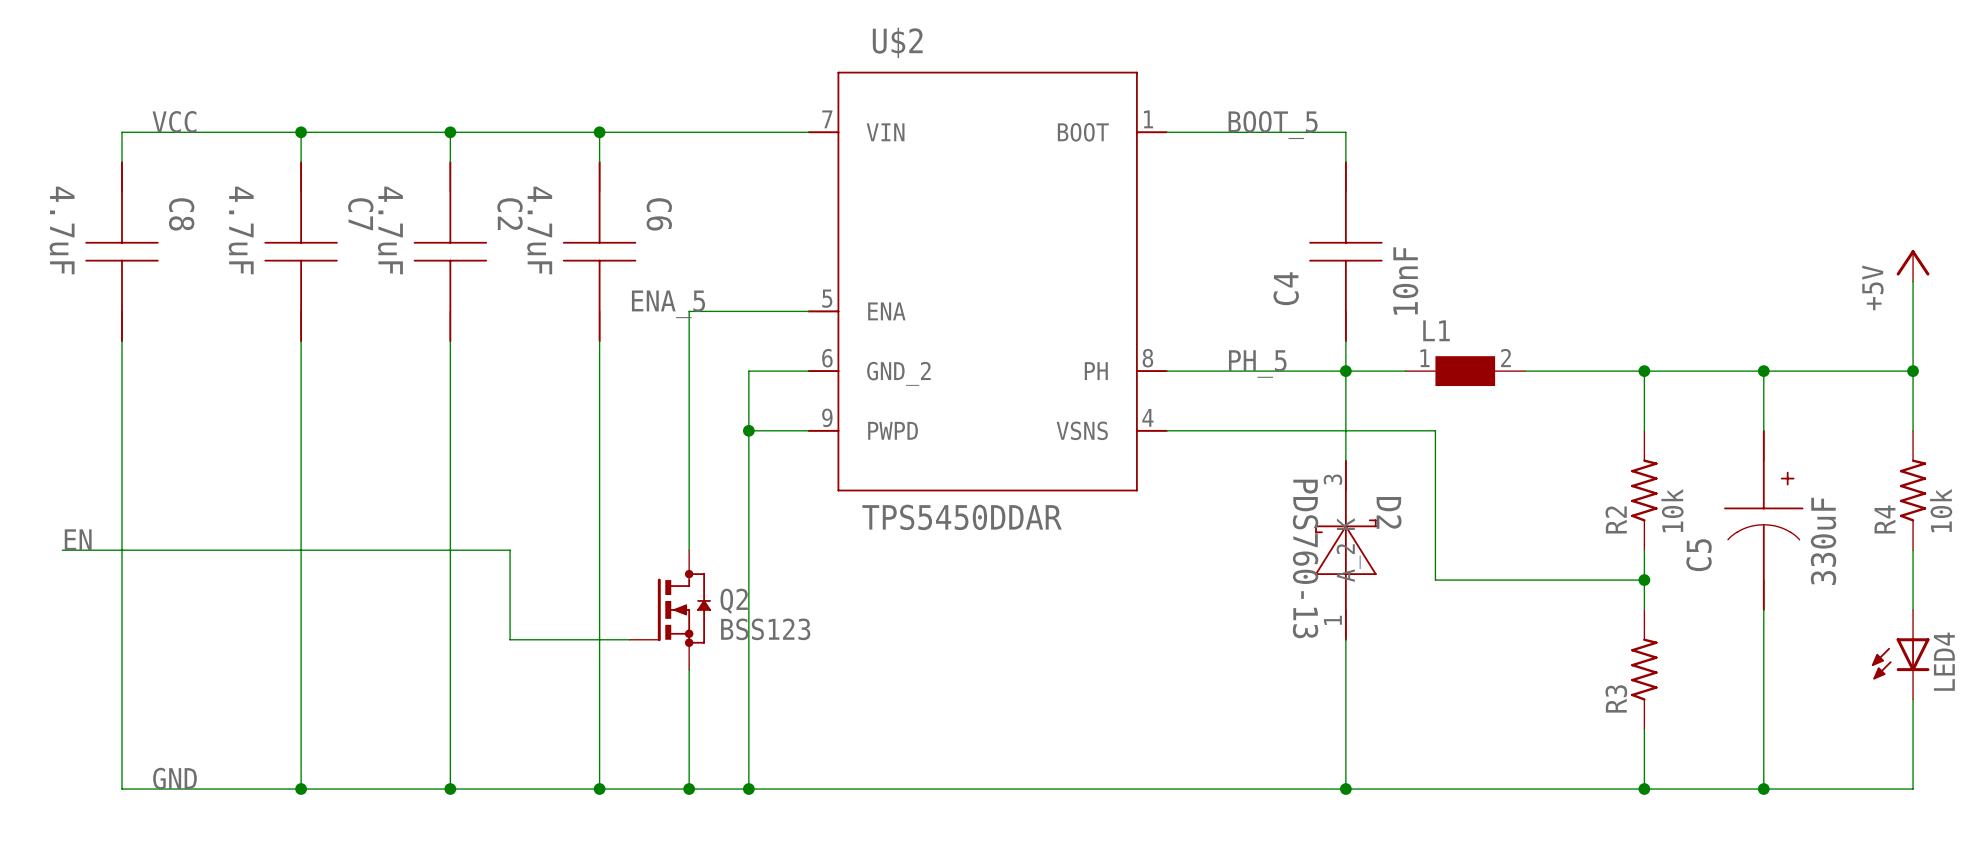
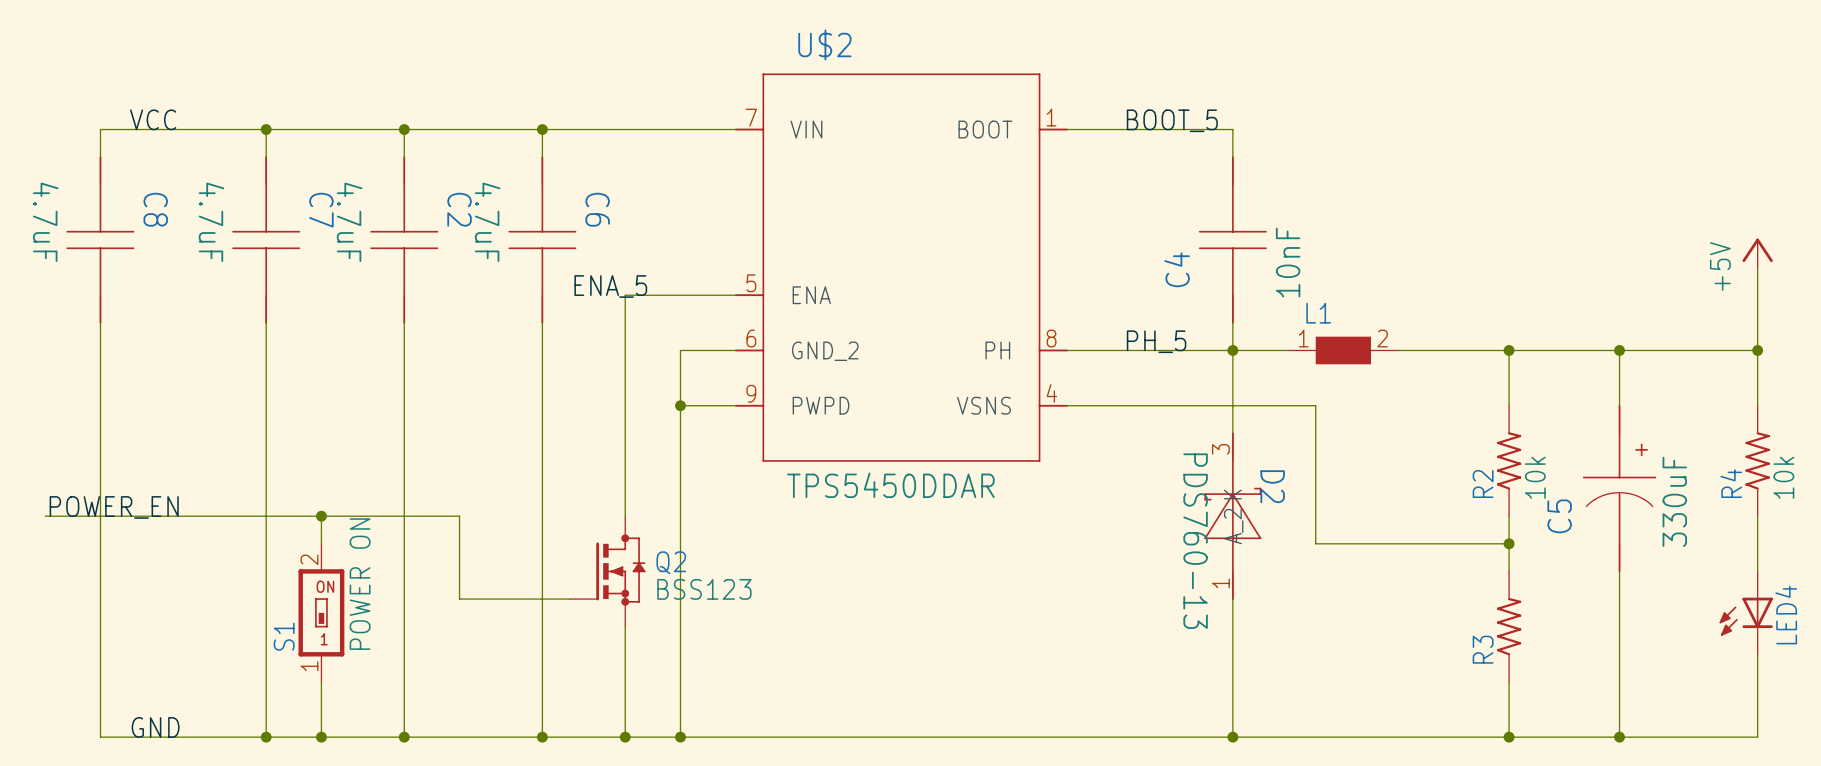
label: EN (78, 539) -> POWER_EN (114, 507)
wire: none -> (321, 516) (321, 543)
junction: none -> (321, 516)
S1: none -> POWER ON (321, 612)
wire: none -> (321, 681) (321, 737)
junction: none -> (321, 737)

